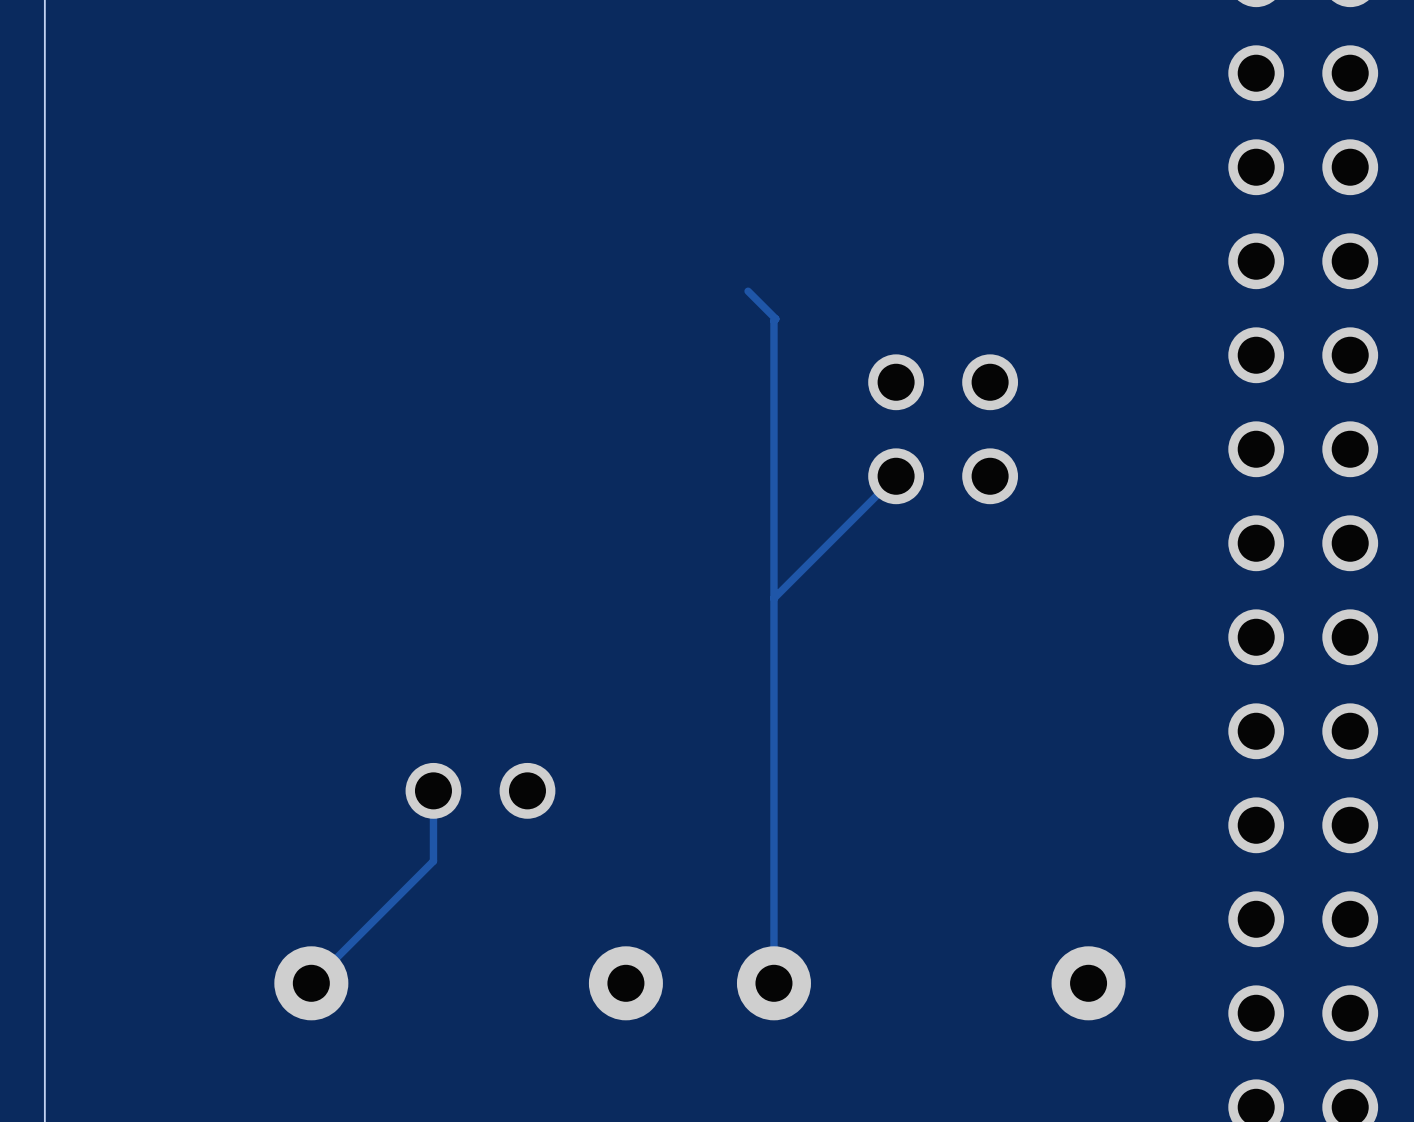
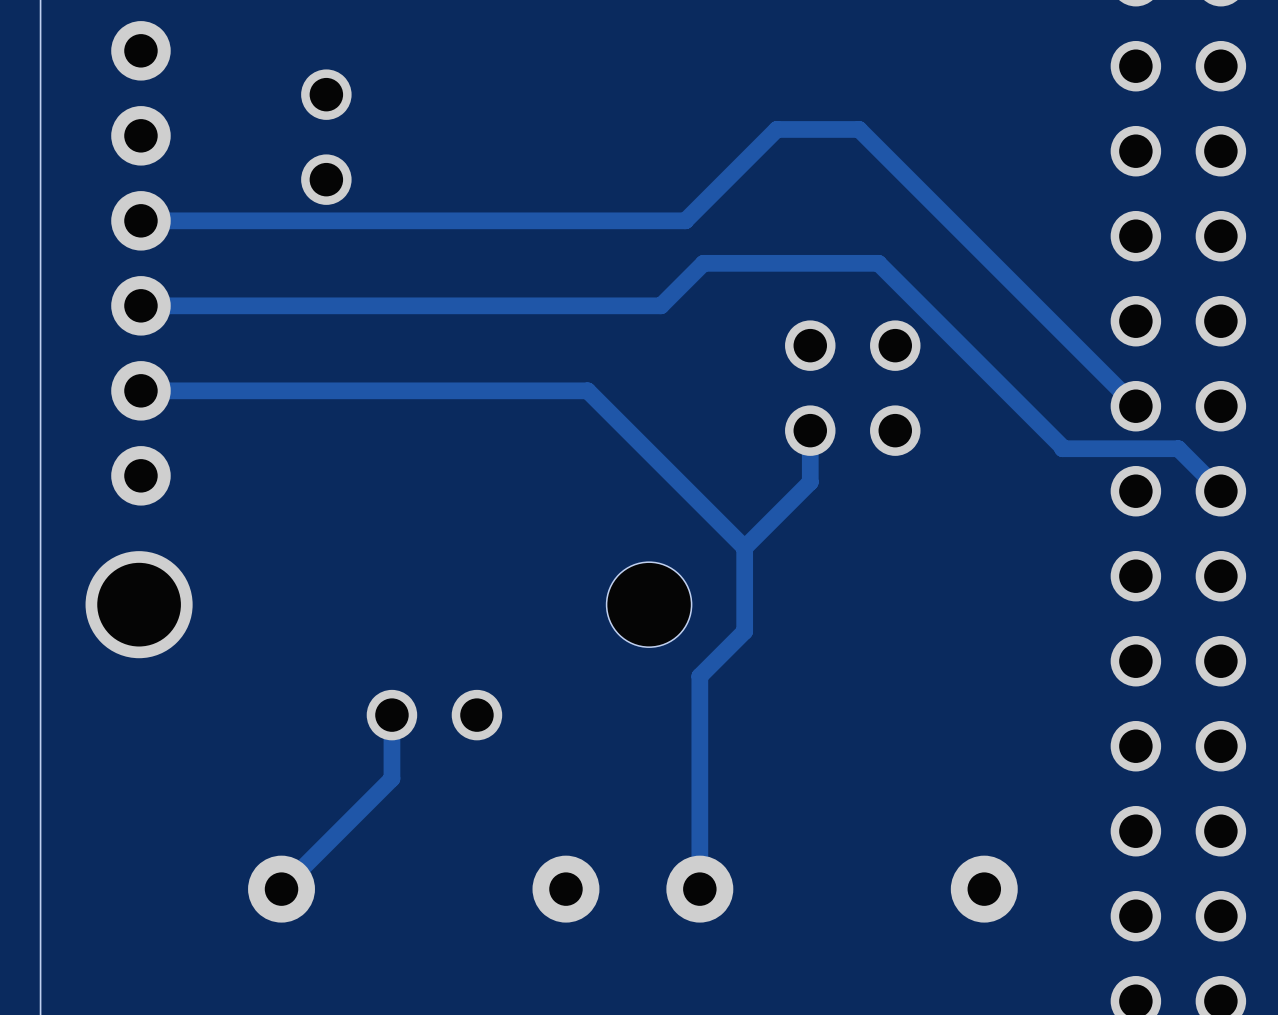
part: none -> (326, 94)
part: none -> (326, 179)
track: none -> (140, 220) (685, 220) (776, 129) (859, 129) (1135, 406)
part: none -> (140, 263)
track: (748, 291) (775, 318) (773, 320) (773, 747) -> (744, 547) (744, 631) (699, 676)
track: none -> (140, 305) (661, 305) (703, 263) (878, 263) (1062, 448) (1178, 448) (1220, 491)
track: none -> (140, 390) (587, 390) (744, 547)
track: (896, 476) (773, 598) -> (810, 430) (810, 482) (744, 547)
part: none -> (139, 604)
part: none -> (649, 604)
track width: thin (773, 747) (773, 983) -> thick (699, 676) (699, 889)
track width: thin (433, 790) (433, 861) (311, 983) -> thick (391, 715) (391, 778) (281, 889)

